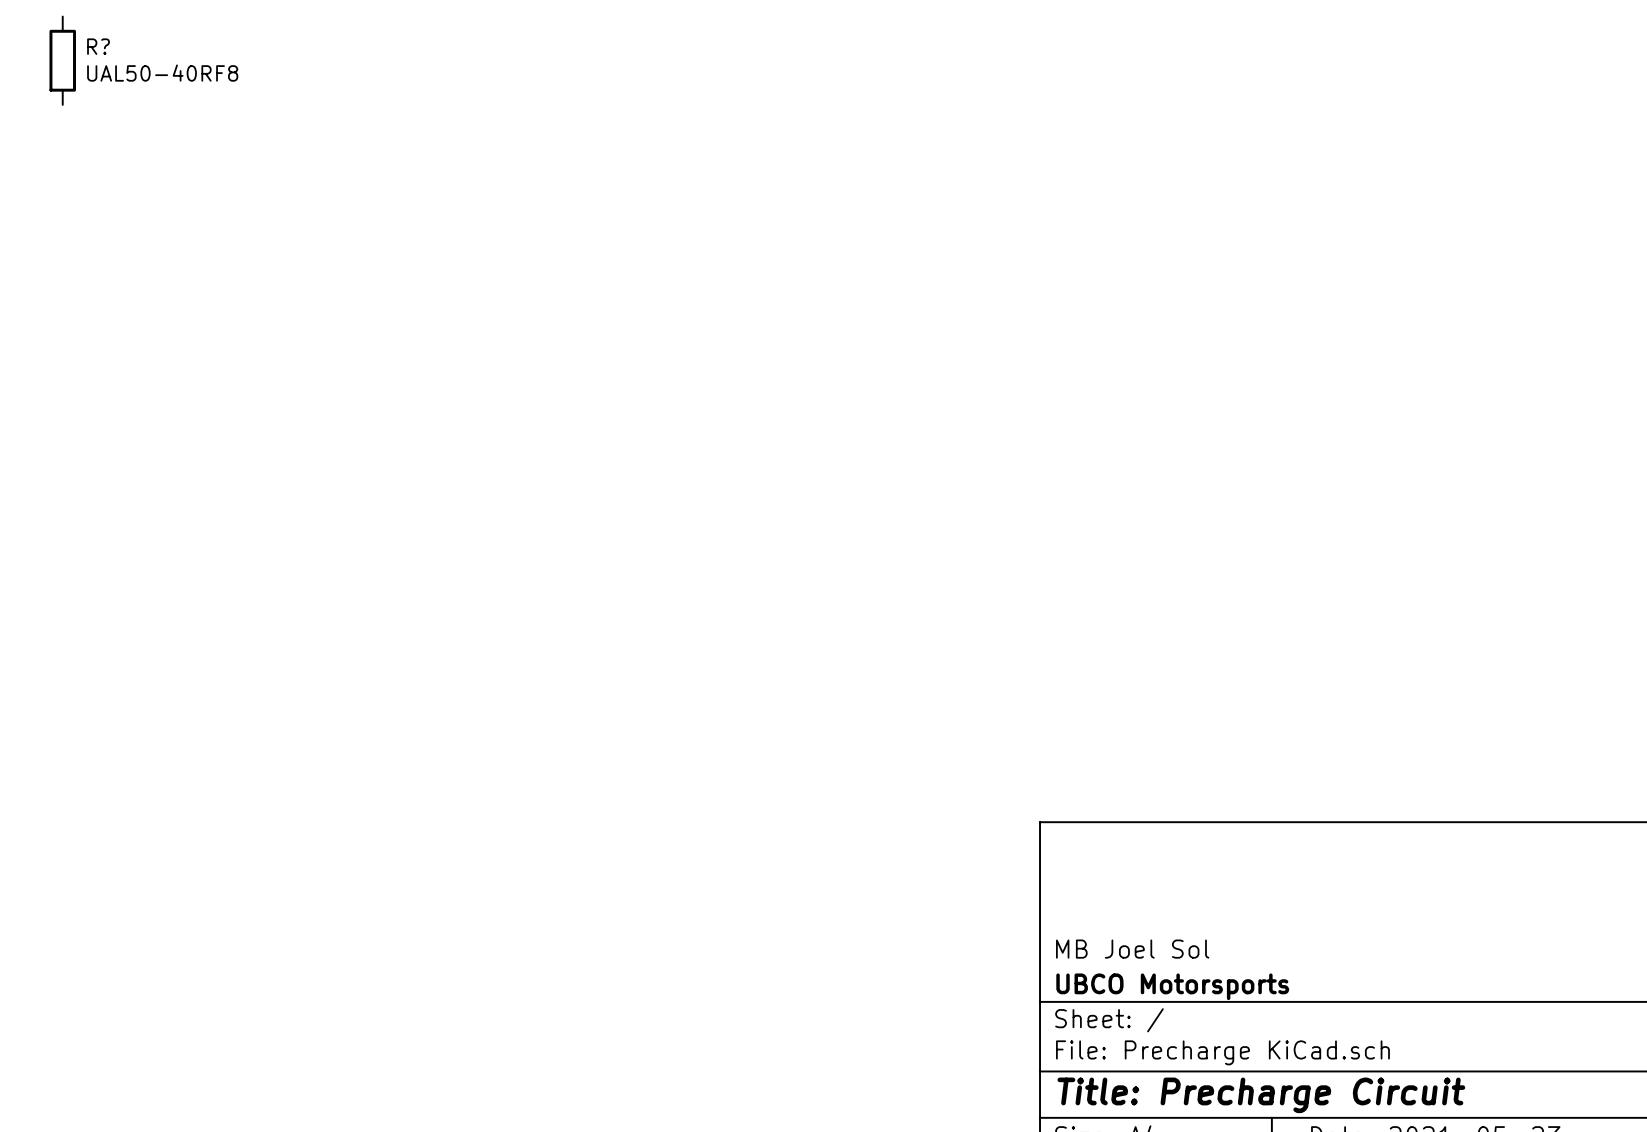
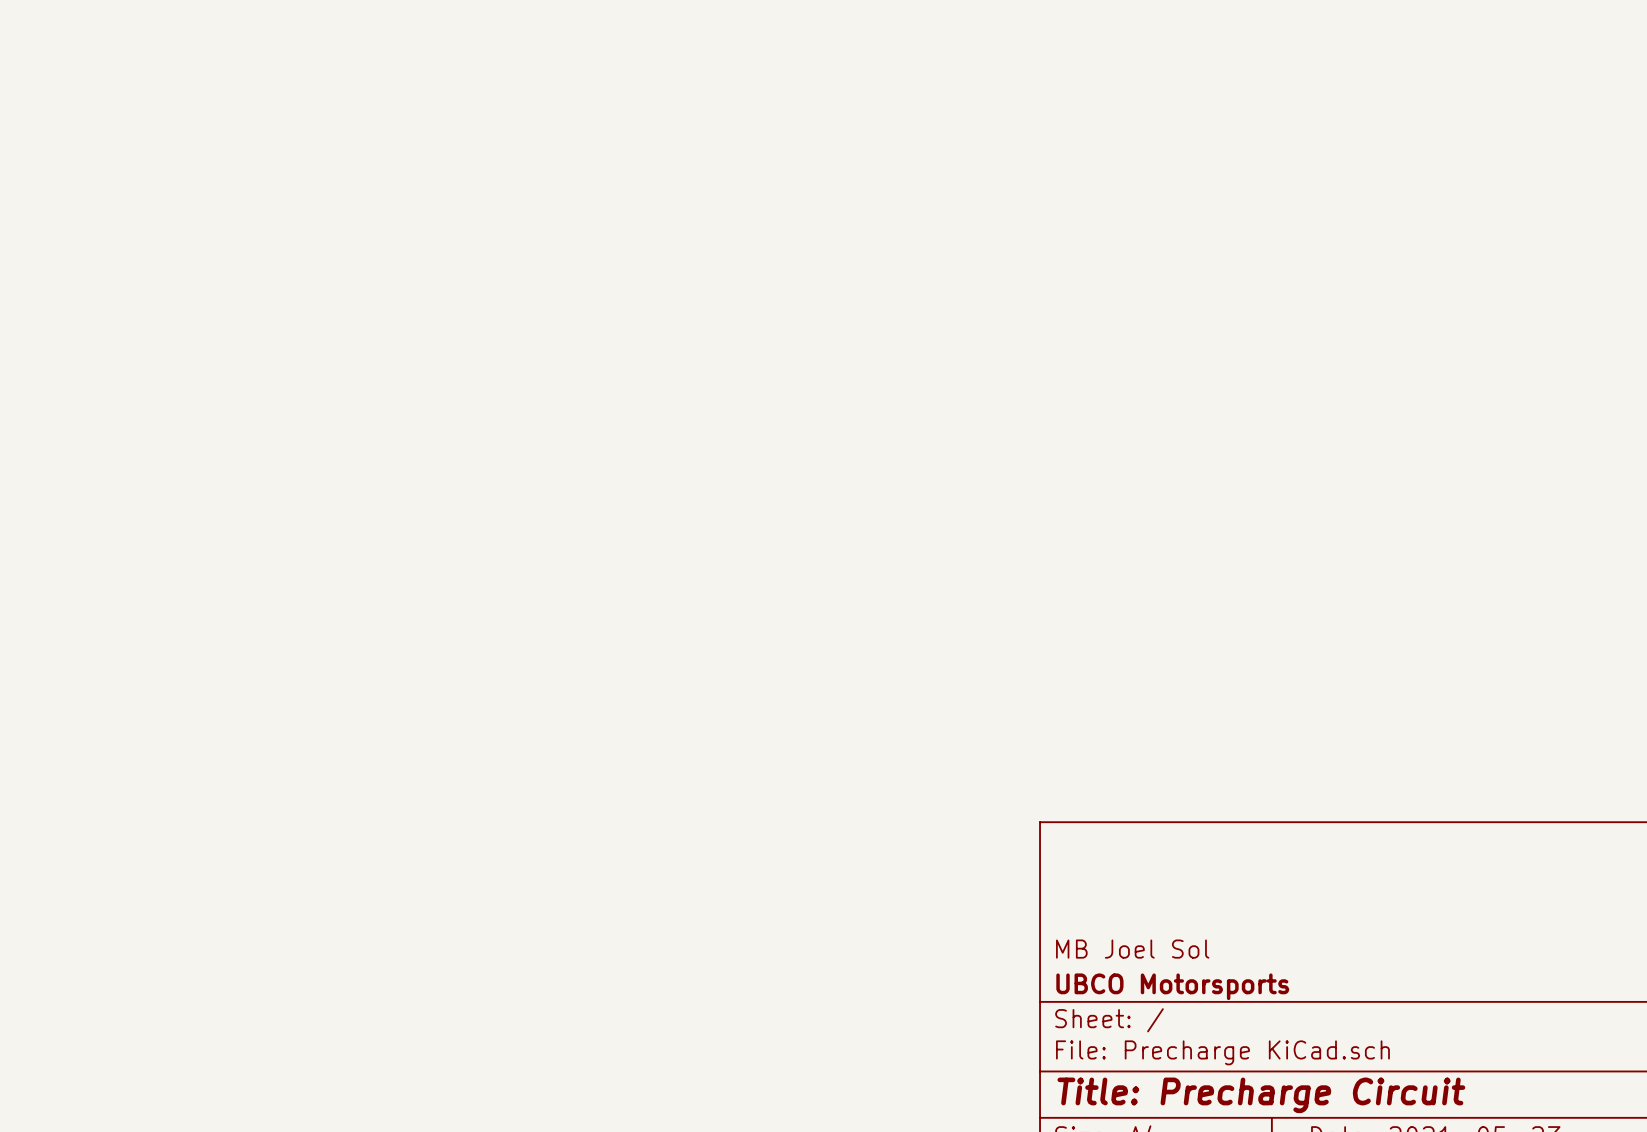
R?: UAL50-40RF8 (62, 60) -> none

